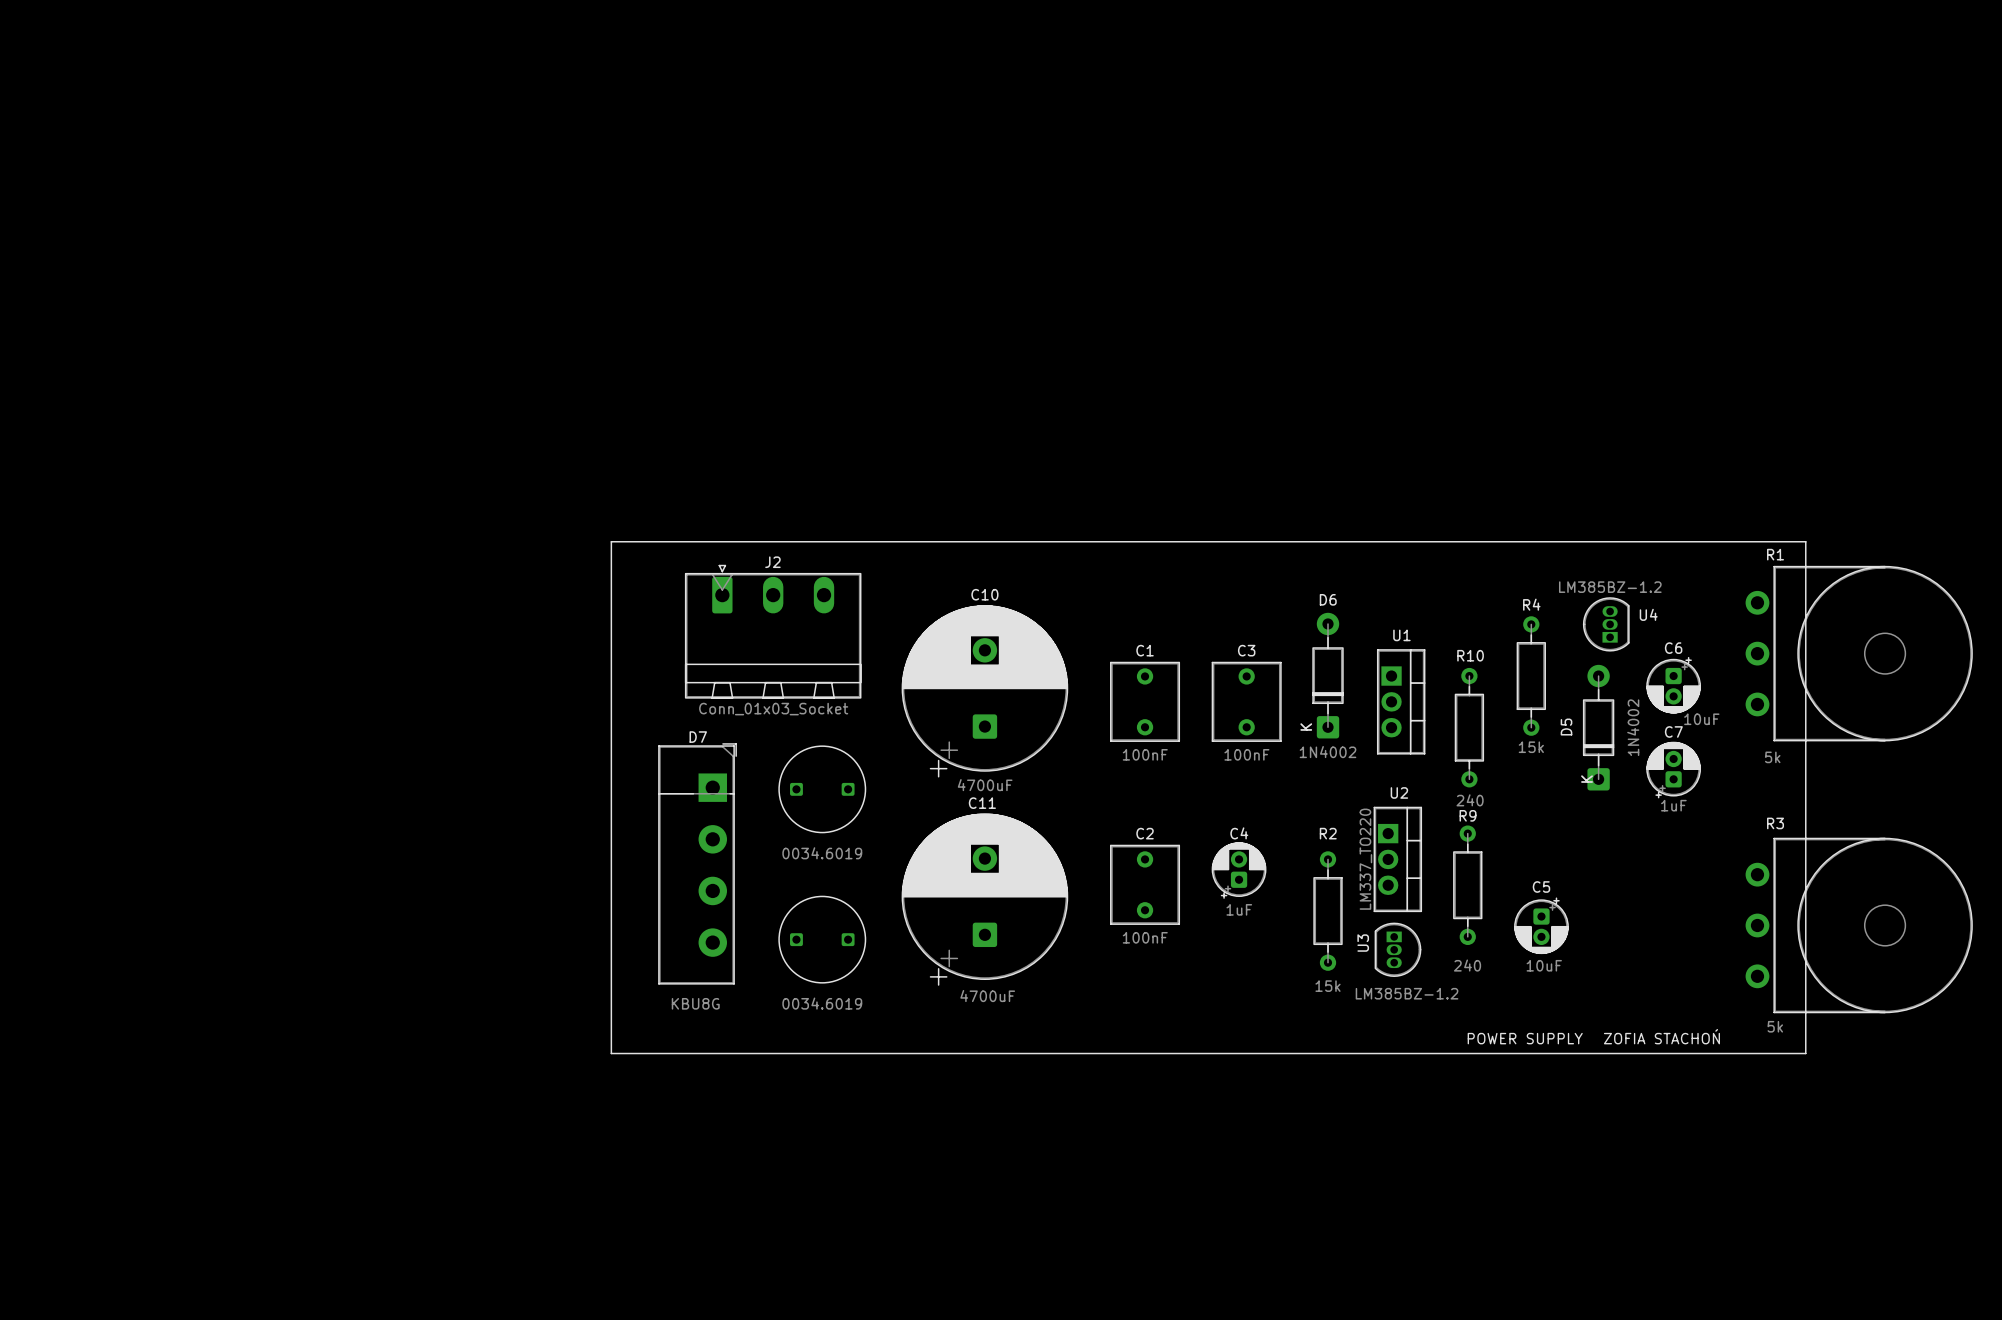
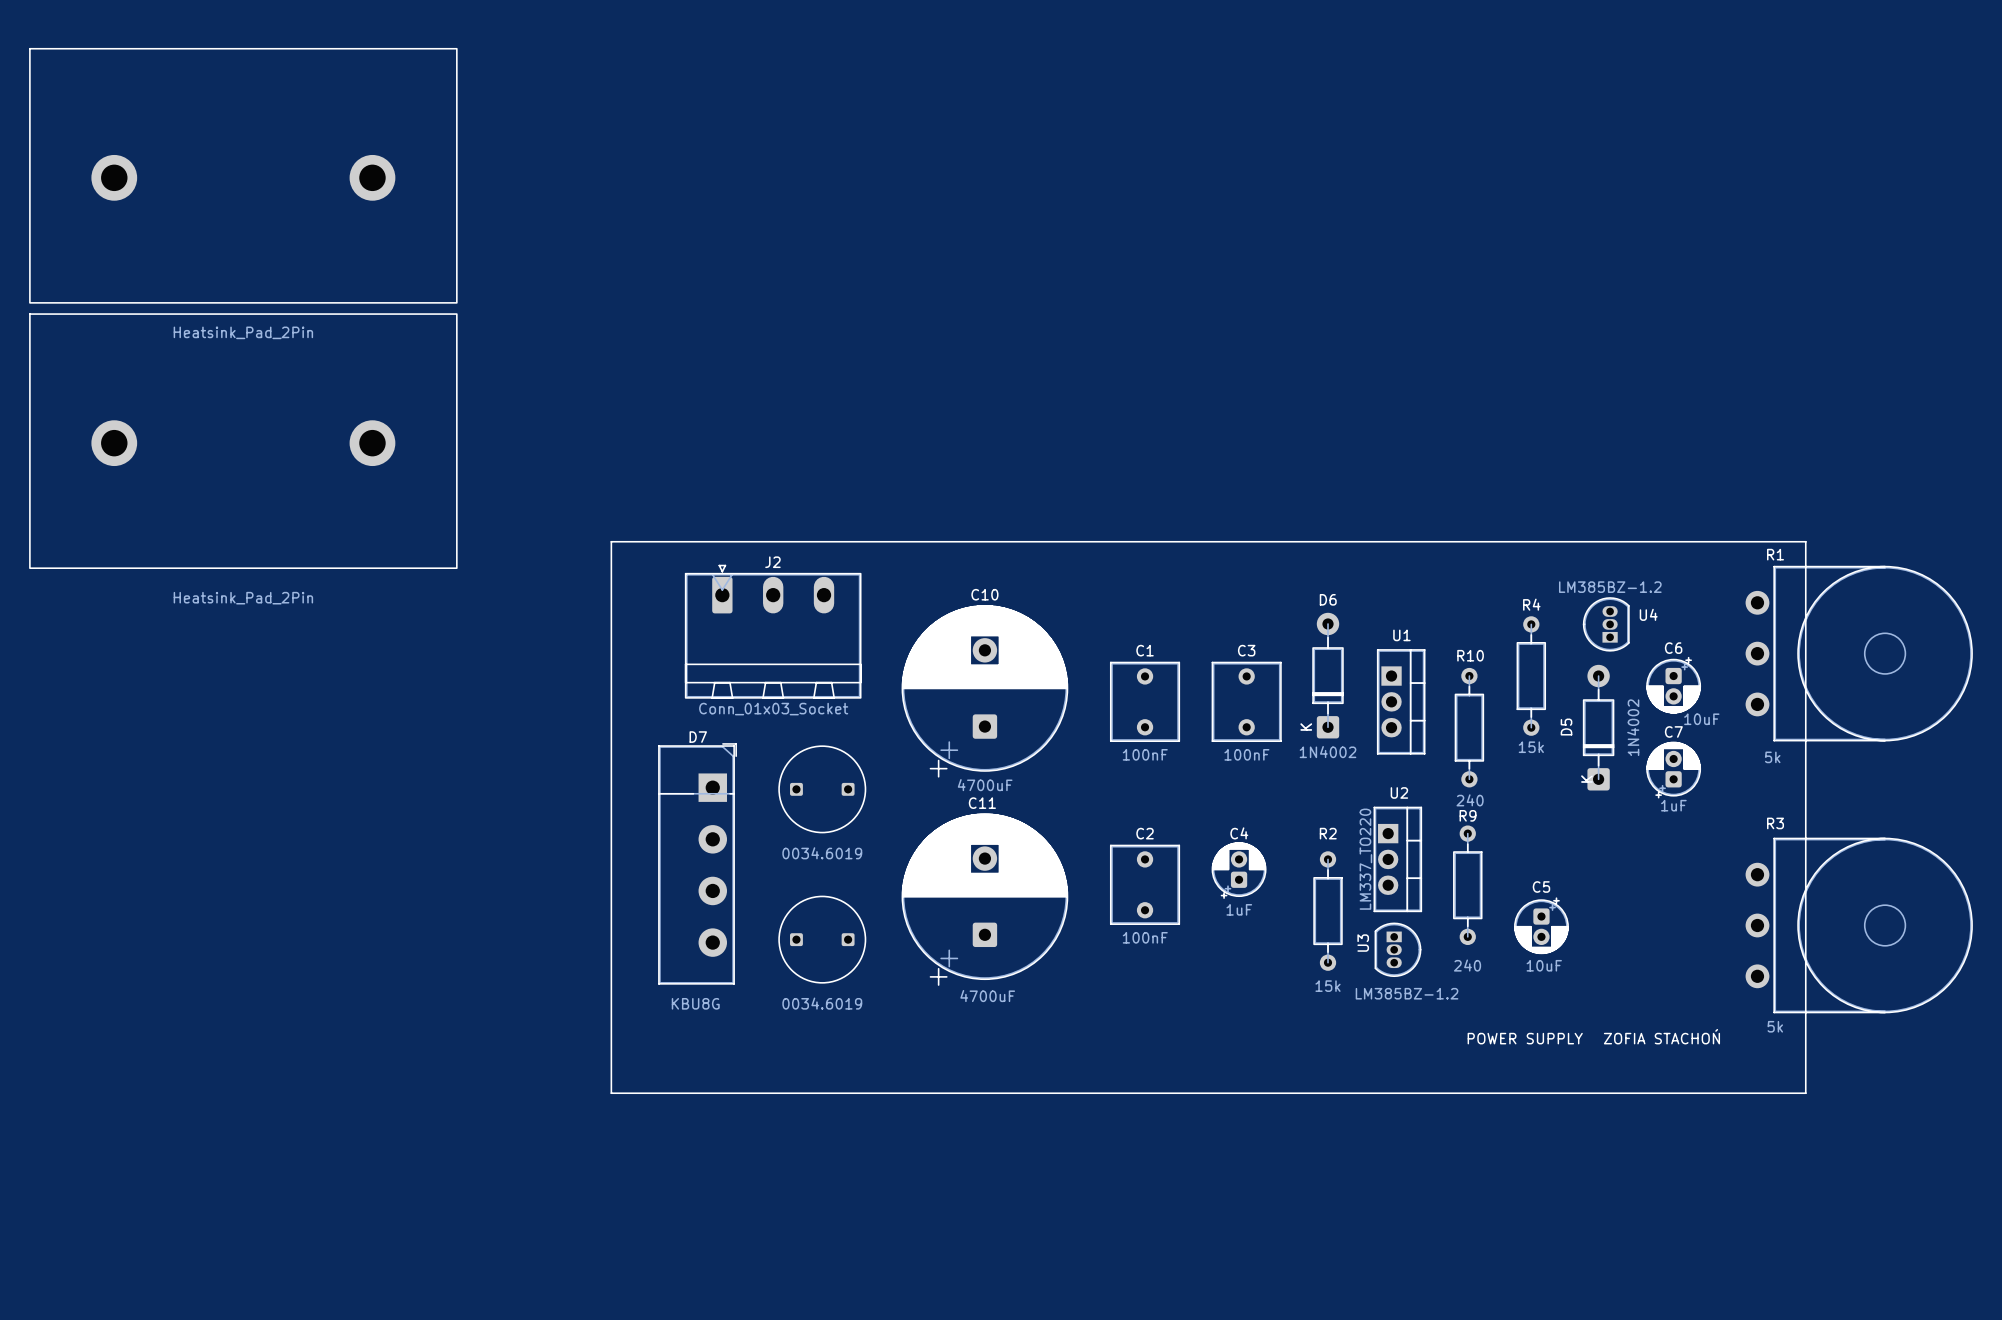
part: none -> Heatsink_Pad_2Pin (243, 175)
part: none -> Heatsink_Pad_2Pin (243, 441)
line: (611, 1053) (1805, 1053) -> (611, 1053) (611, 1093) (1805, 1093) (1805, 1053)

